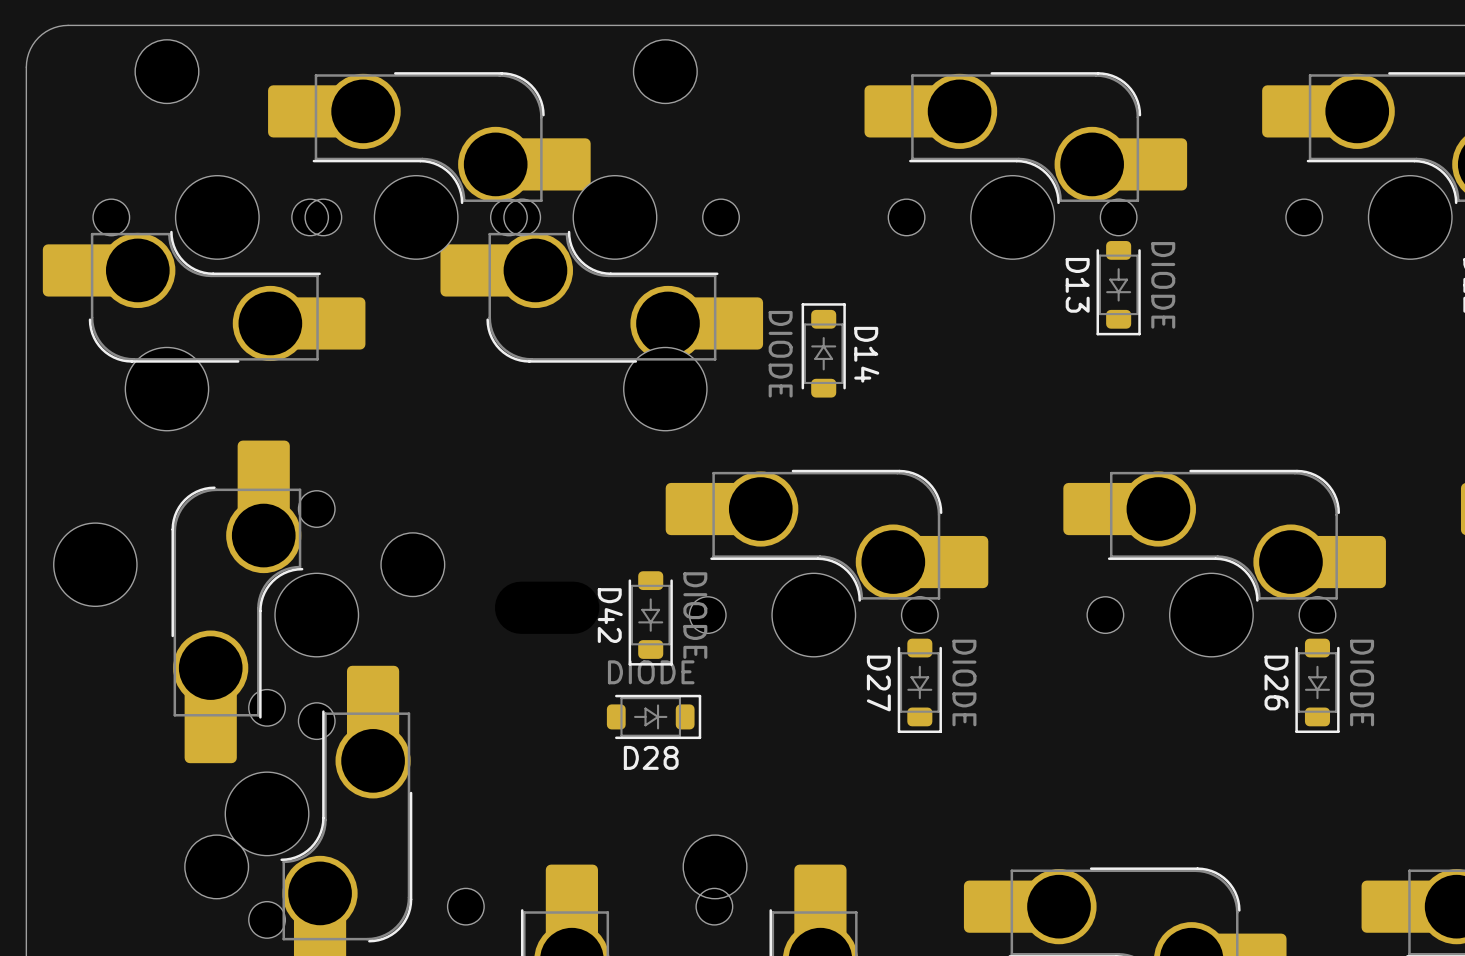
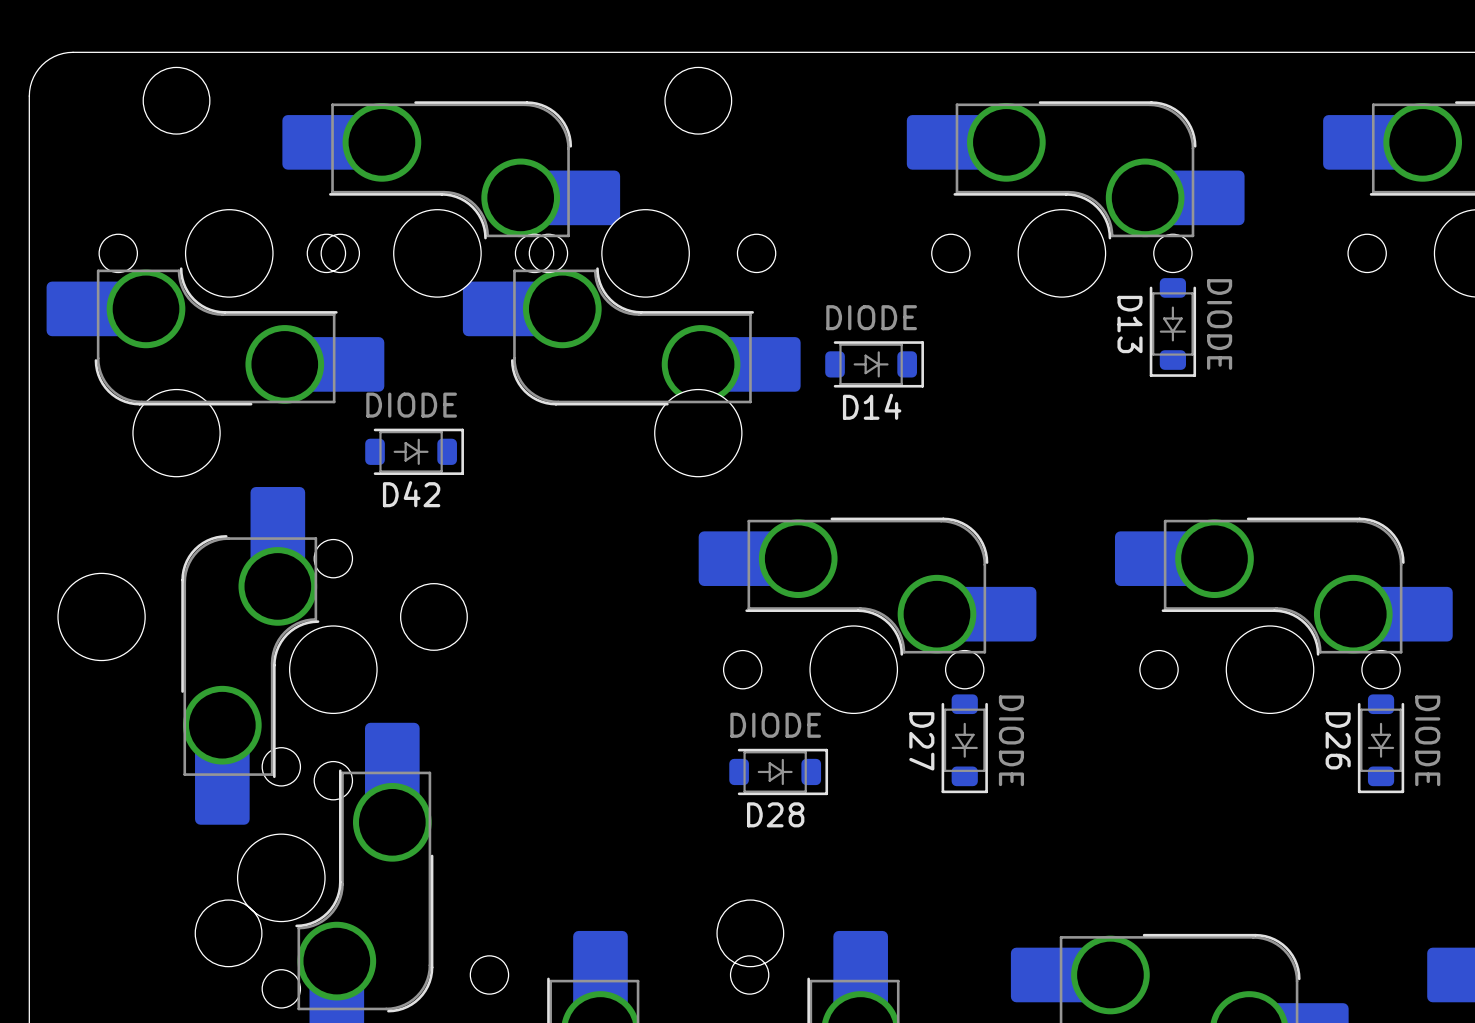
D14 rotation: 0° (823, 350) -> 90° clockwise (874, 364)
D42 rotation: 0° (650, 618) -> 90° counterclockwise (414, 451)
D42 position: (650, 618) -> (414, 451)
D28 position: (654, 716) -> (778, 771)

